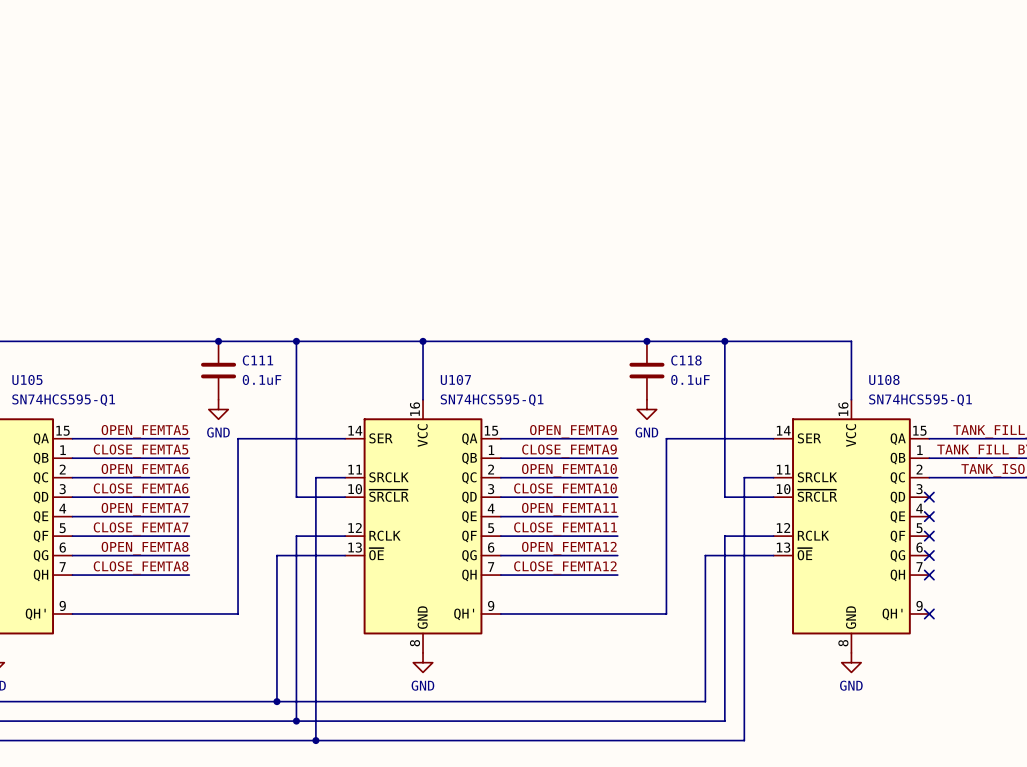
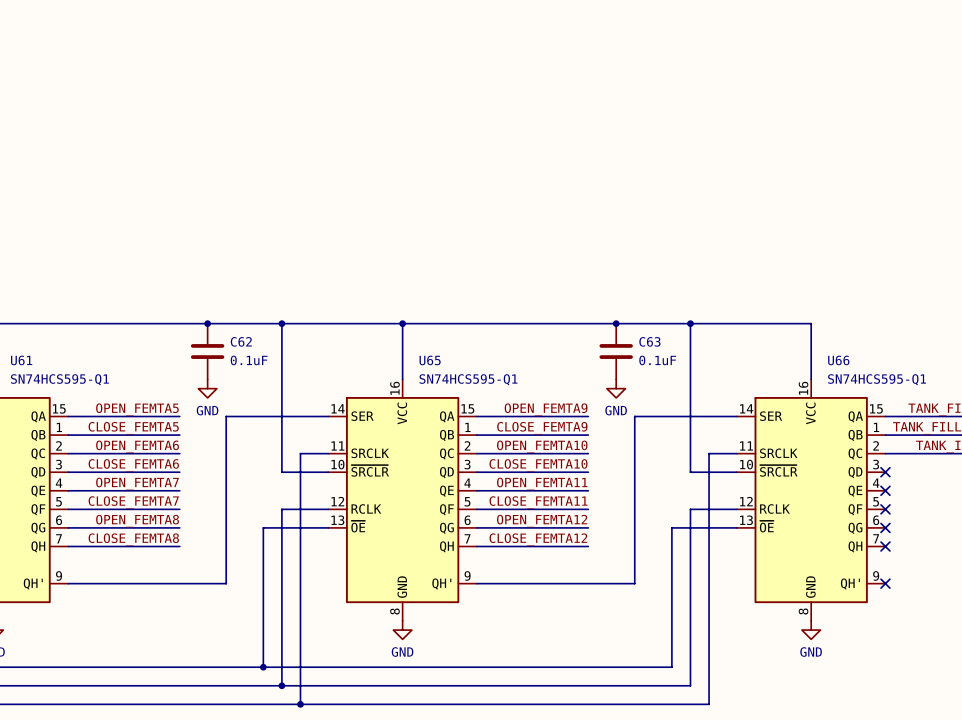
C111 name: C111 (257, 360) -> C62 (241, 341)
C118 name: C118 (686, 360) -> C63 (649, 341)
U105 name: U105 (27, 379) -> U61 (21, 360)
U107 name: U107 (455, 379) -> U65 (430, 360)
U108 name: U108 (884, 379) -> U66 (838, 360)

